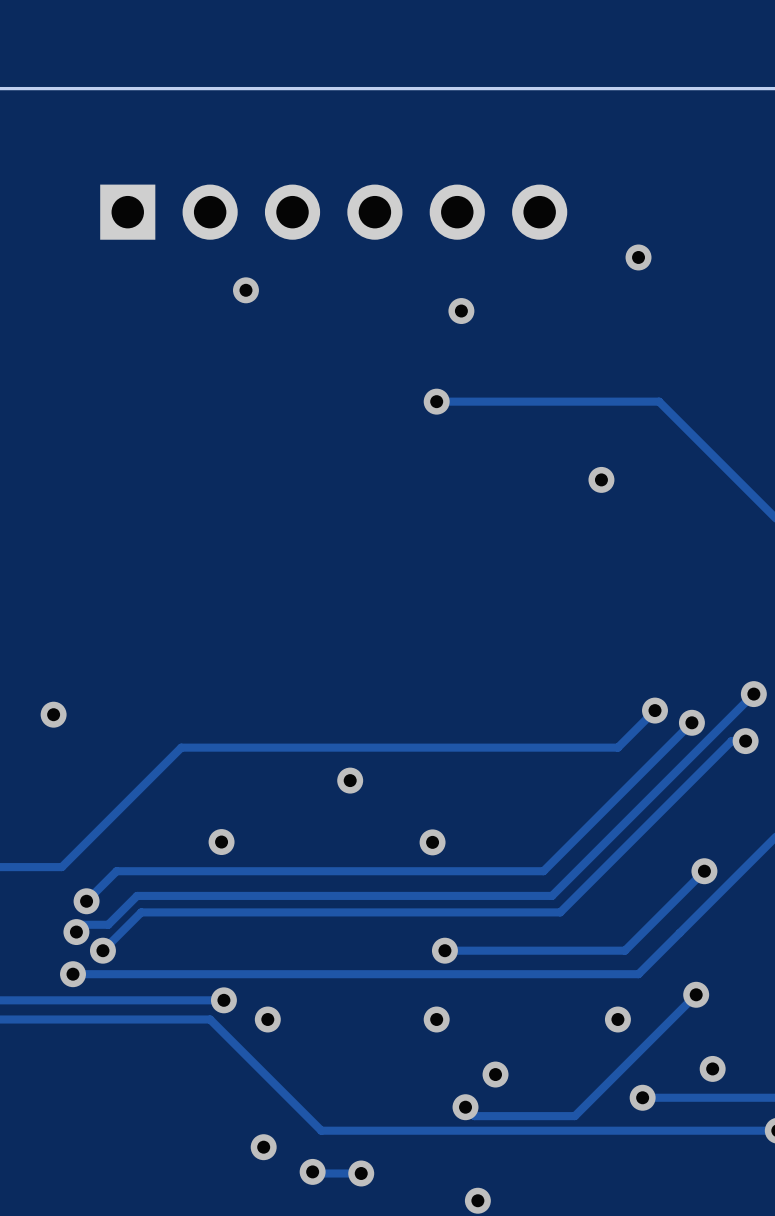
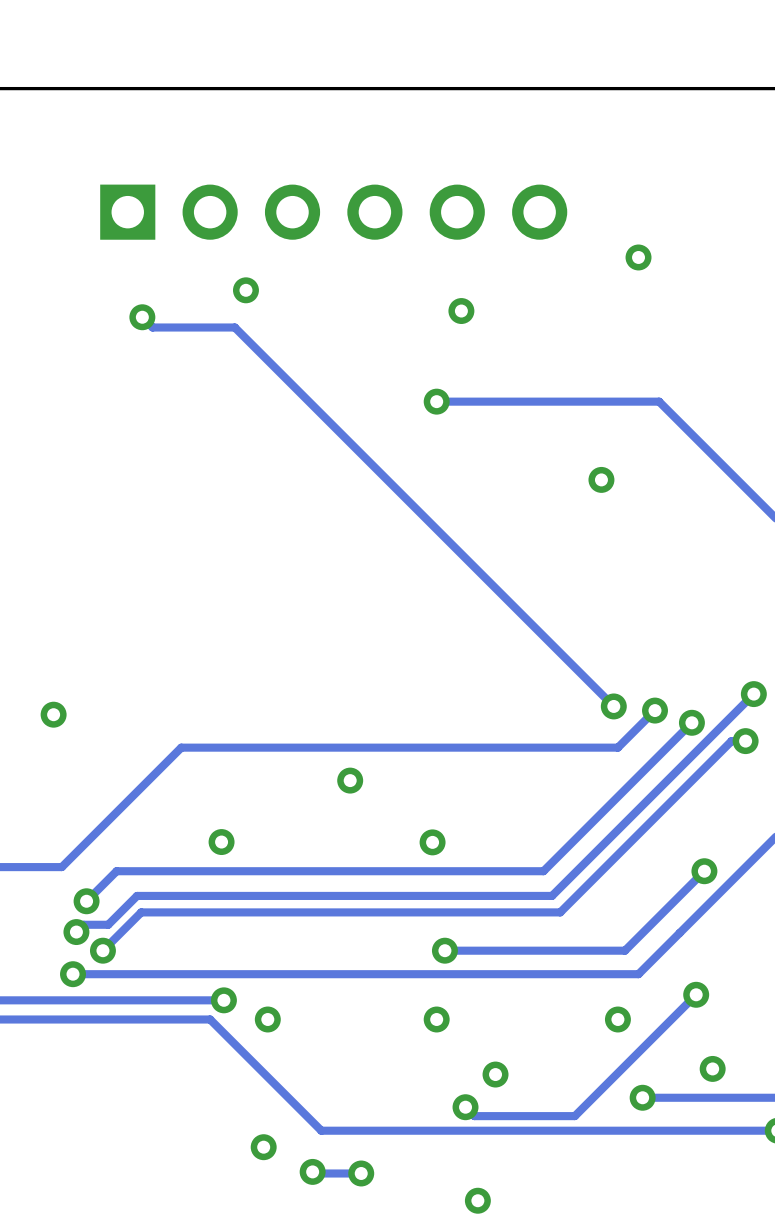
track: none -> (142, 317) (152, 327) (234, 327) (613, 706)
via: none -> (142, 317)
via: none -> (613, 706)

